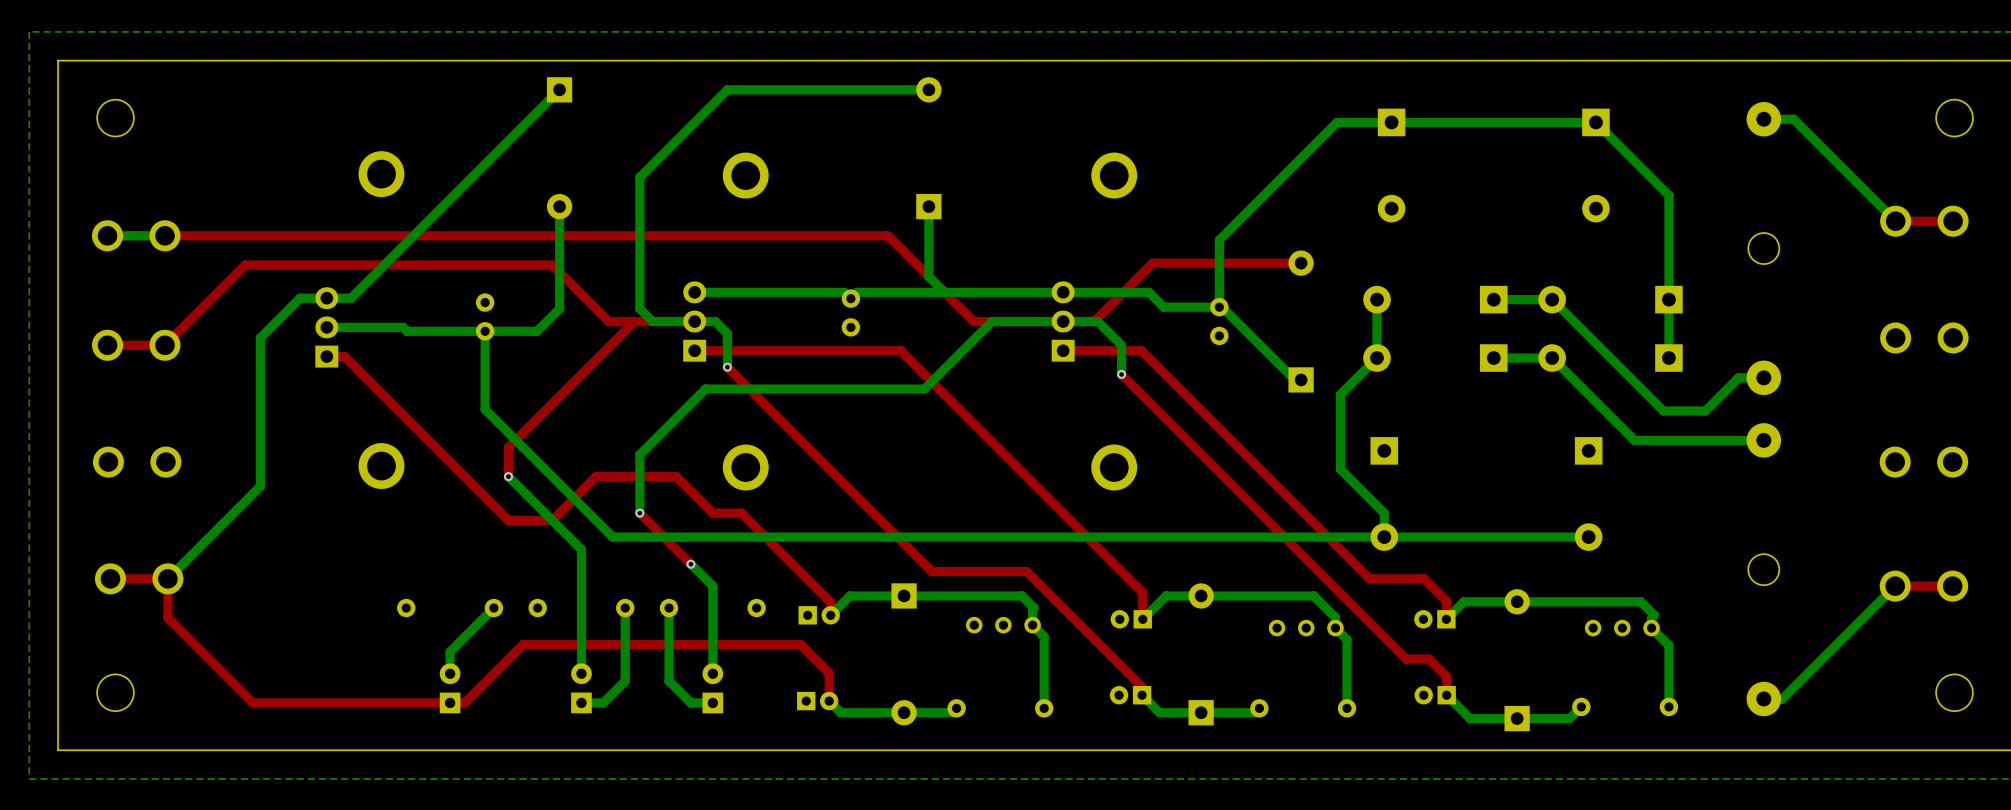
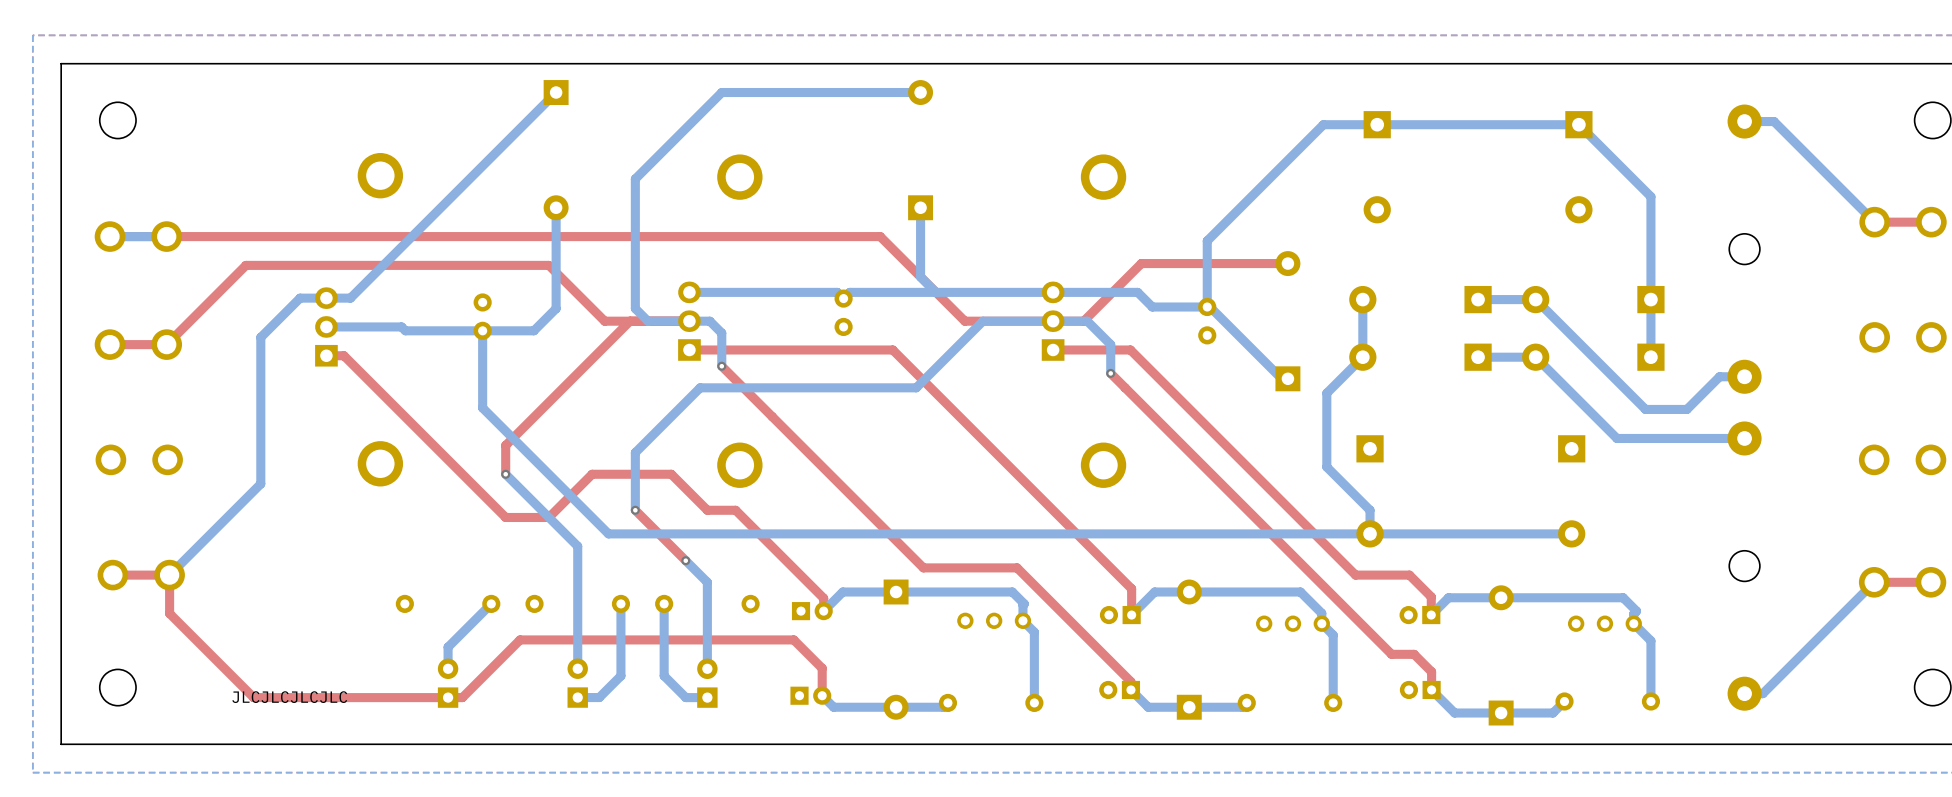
text: none -> JLCJLCJLCJLC (289, 697)

